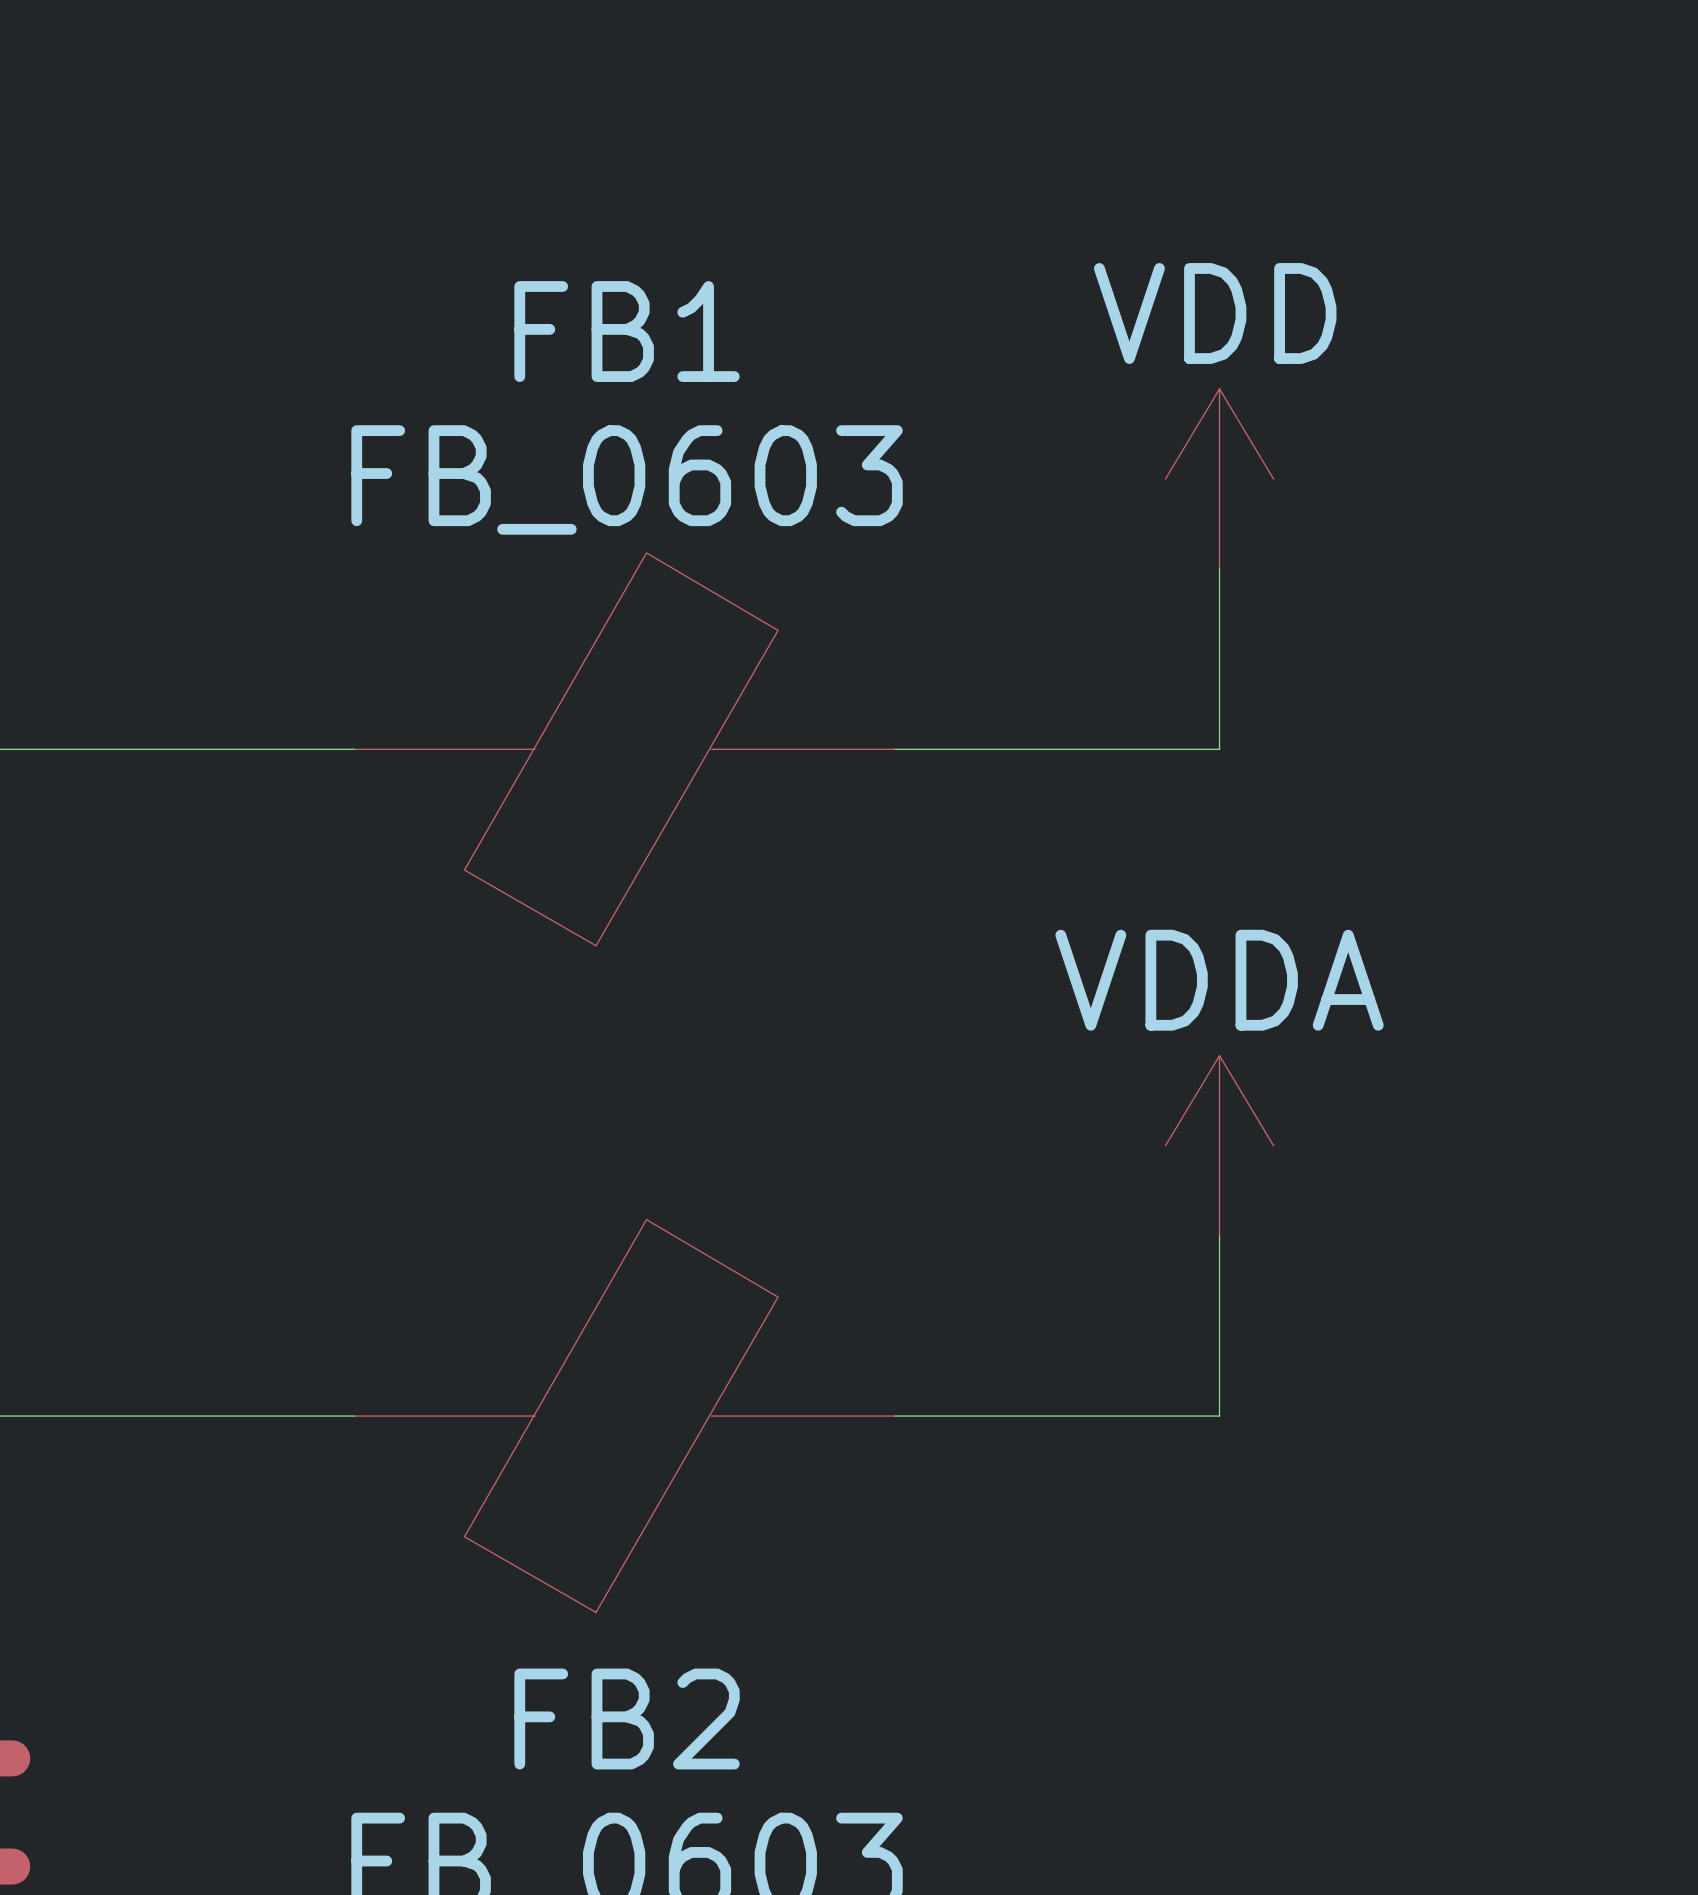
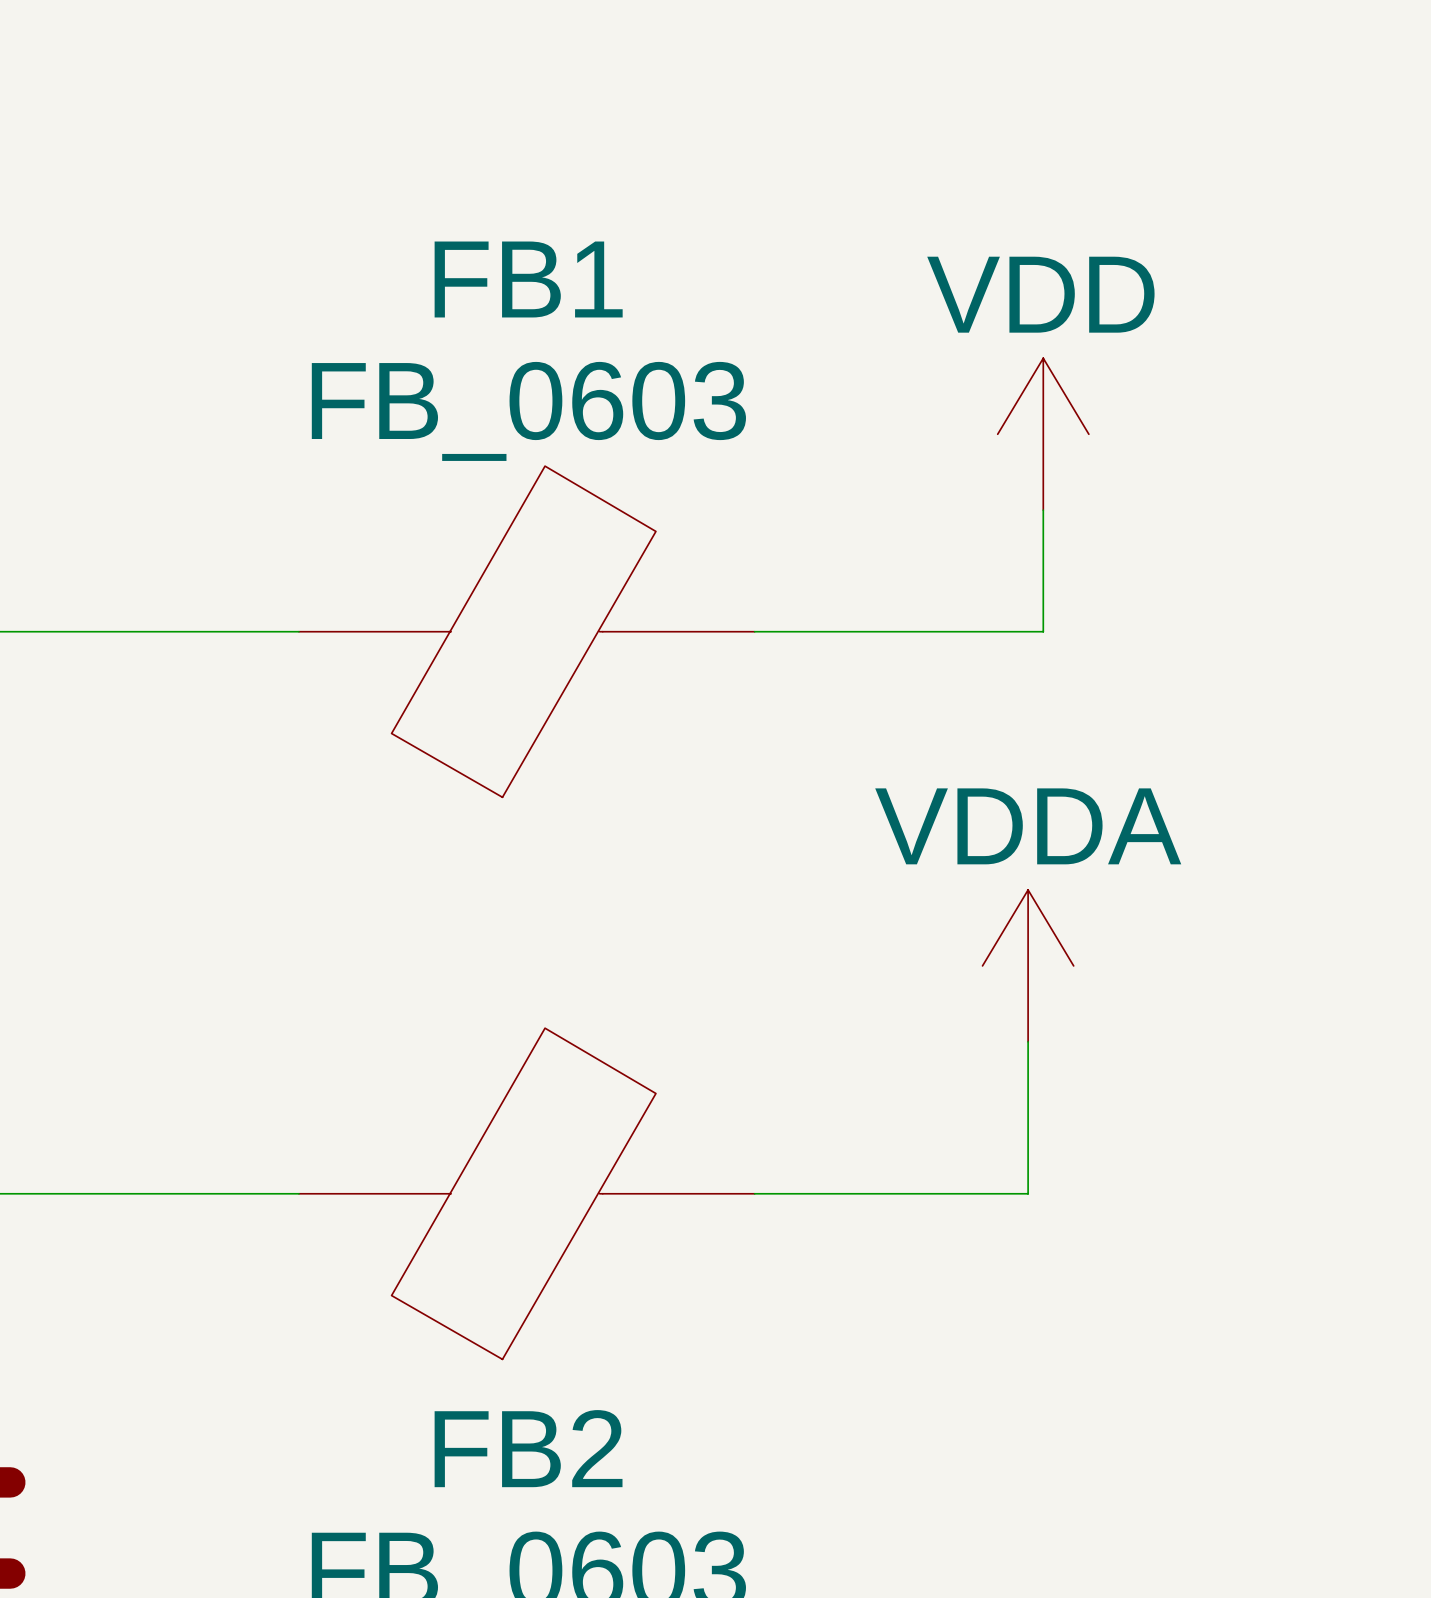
power symbol position: VDD (1219, 479) -> VDD (1043, 434)
wire: (1219, 569) (1219, 749) -> (1043, 510) (1043, 631) (1028, 631)

